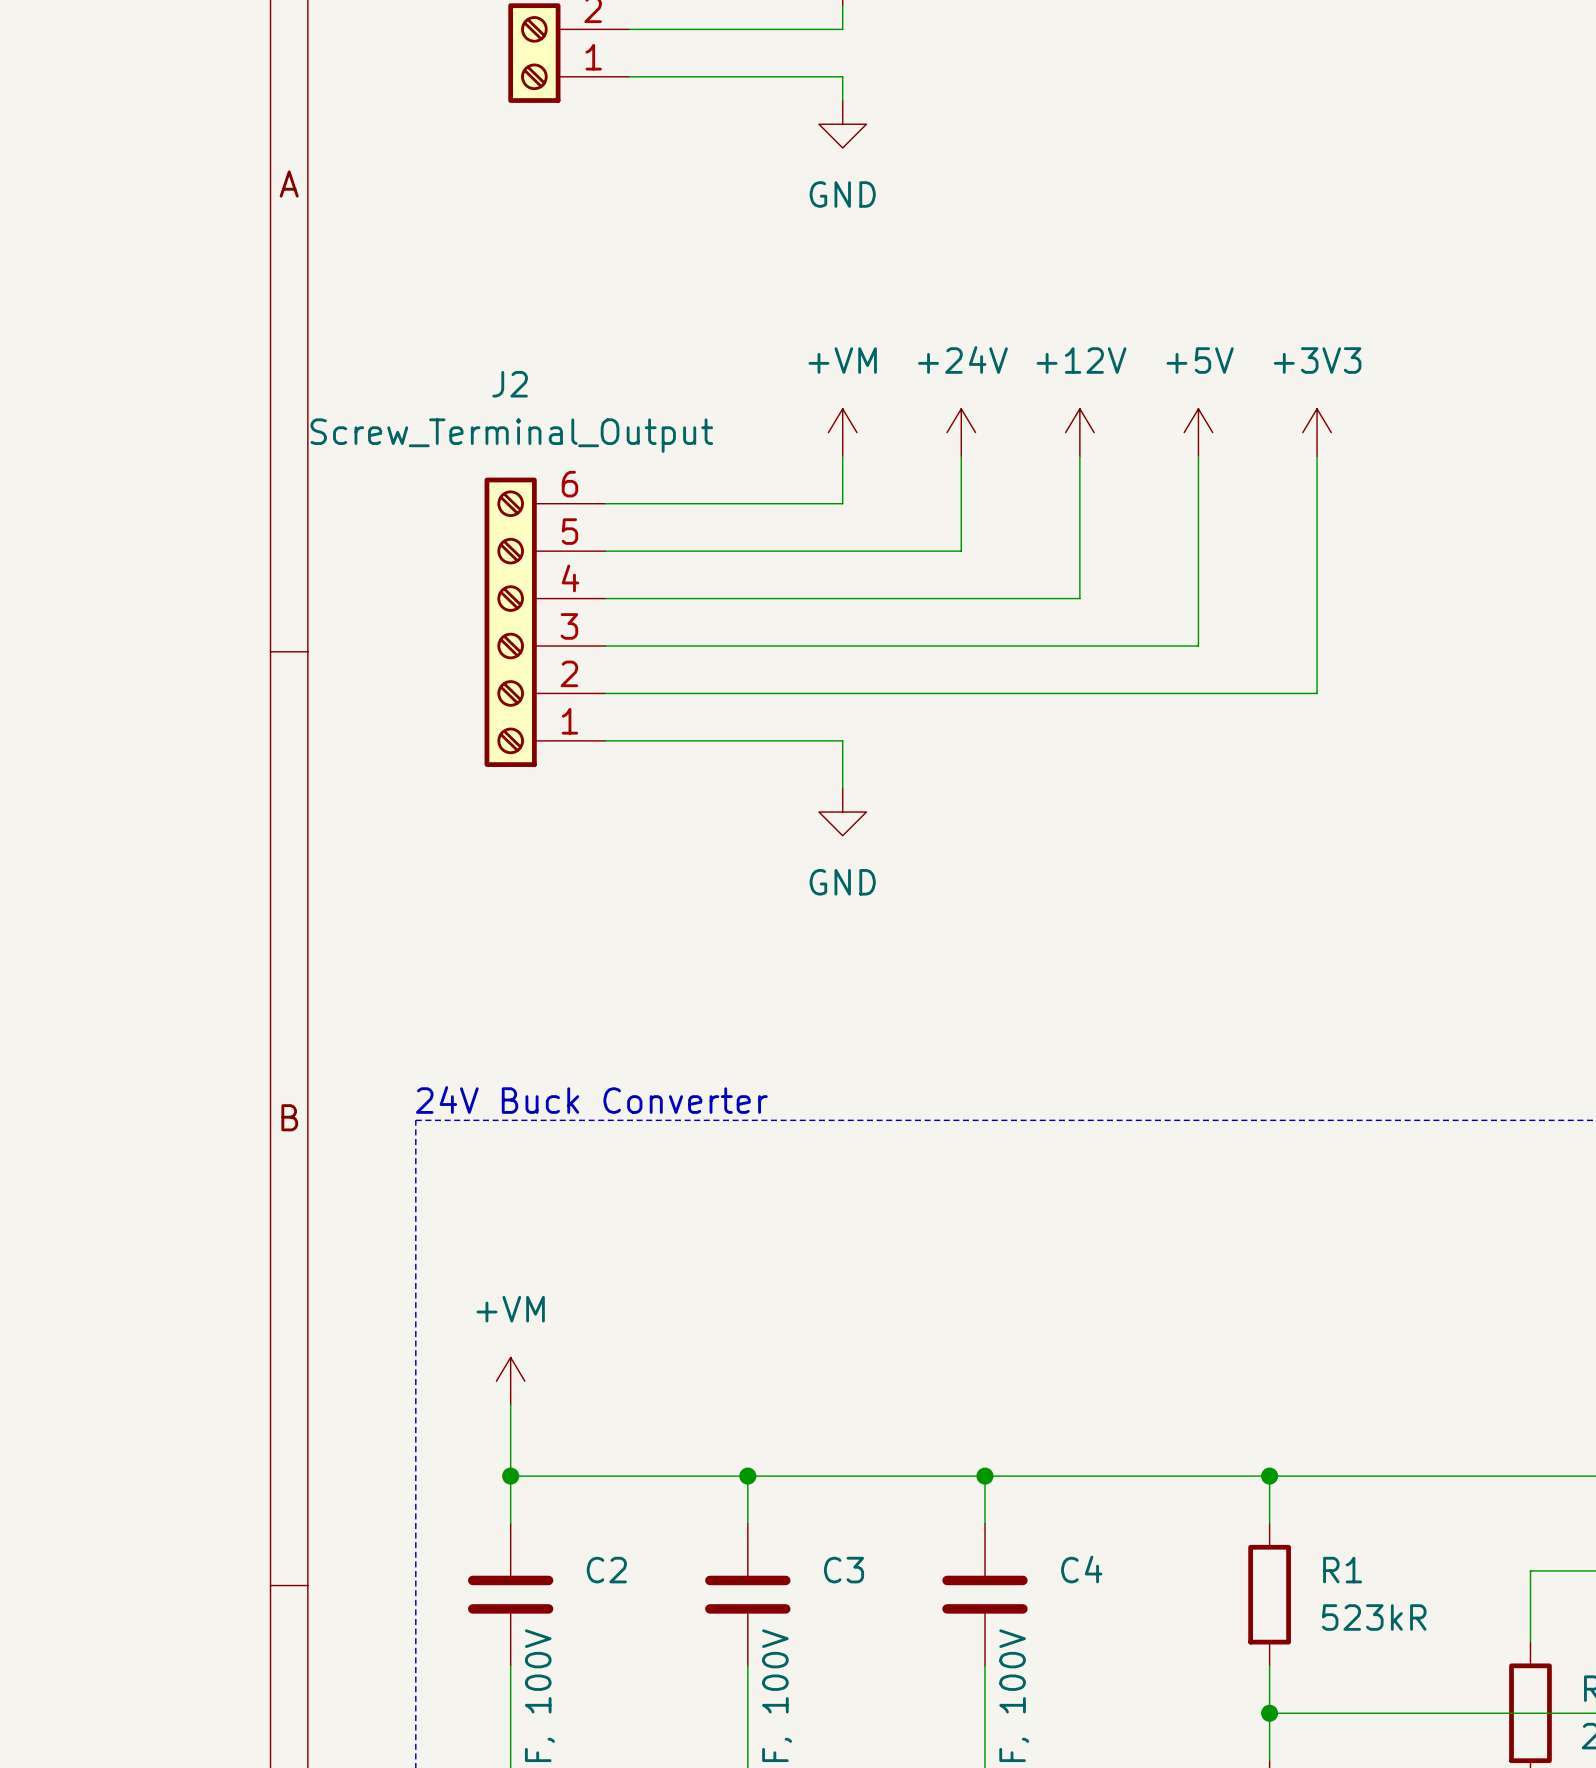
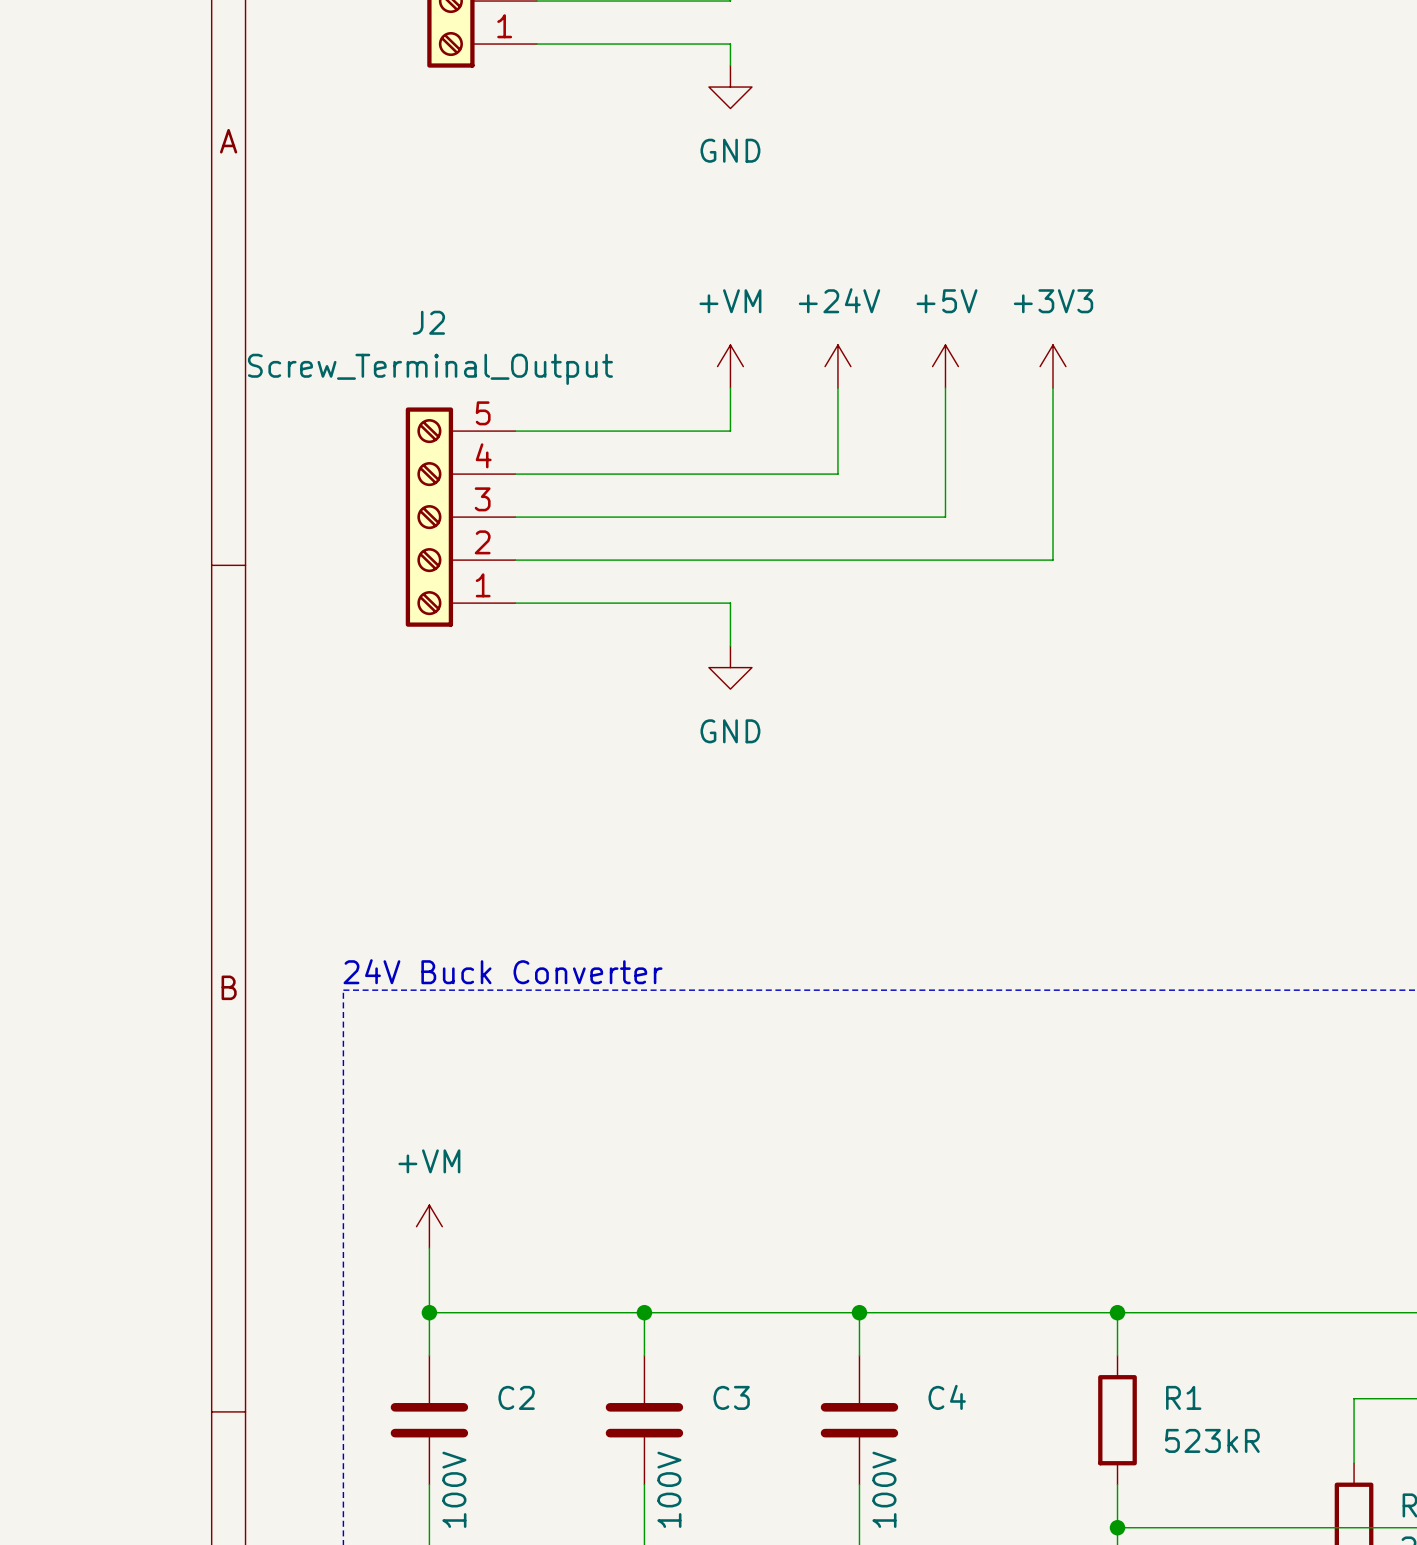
power symbol: +12V (1079, 432) -> +5V (945, 366)
power symbol: +5V (1198, 432) -> +3V3 (1053, 366)
power symbol: +3V3 (1317, 432) -> none
wire: (1317, 456) (1317, 693) (842, 693) -> (730, 646) (730, 603)
J2 symbol: [484, 477, 606, 767] -> [405, 407, 516, 627]
wire: (605, 740) (842, 740) (842, 788) -> none
power symbol position: GND (842, 812) -> GND (730, 667)

